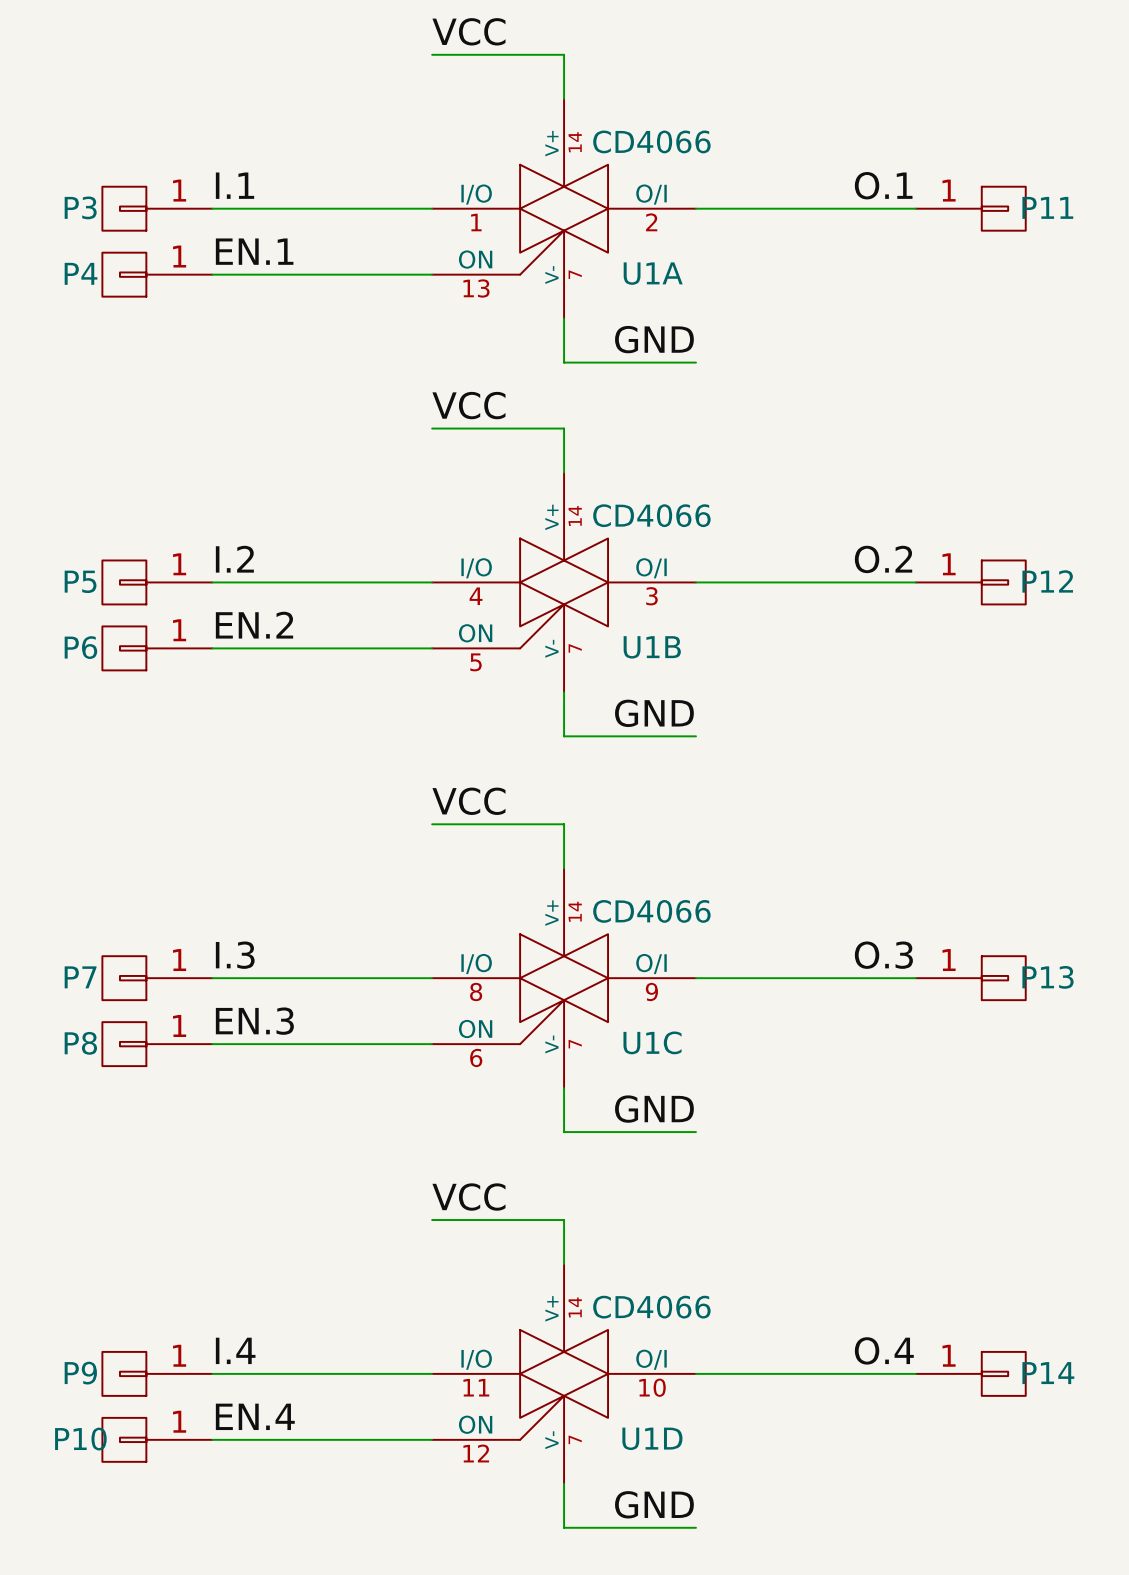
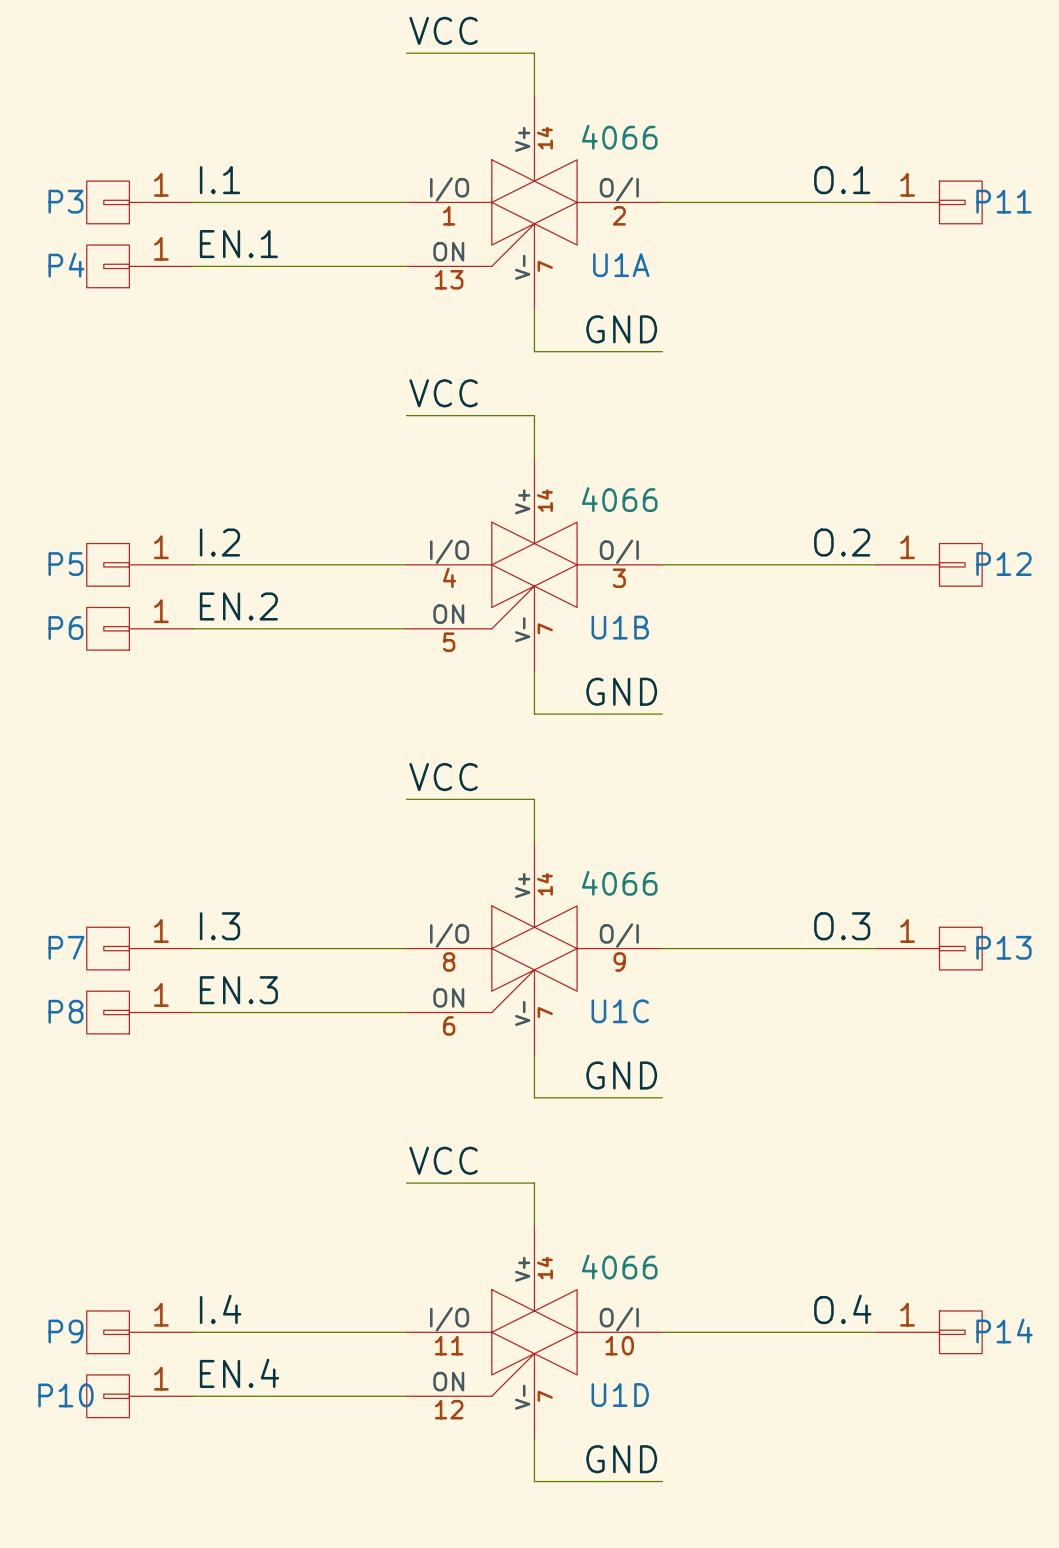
U1A value: CD4066 (651, 141) -> 4066 (619, 137)
U1B value: CD4066 (651, 515) -> 4066 (619, 499)
U1C value: CD4066 (651, 911) -> 4066 (619, 883)
U1D value: CD4066 (651, 1307) -> 4066 (619, 1267)

